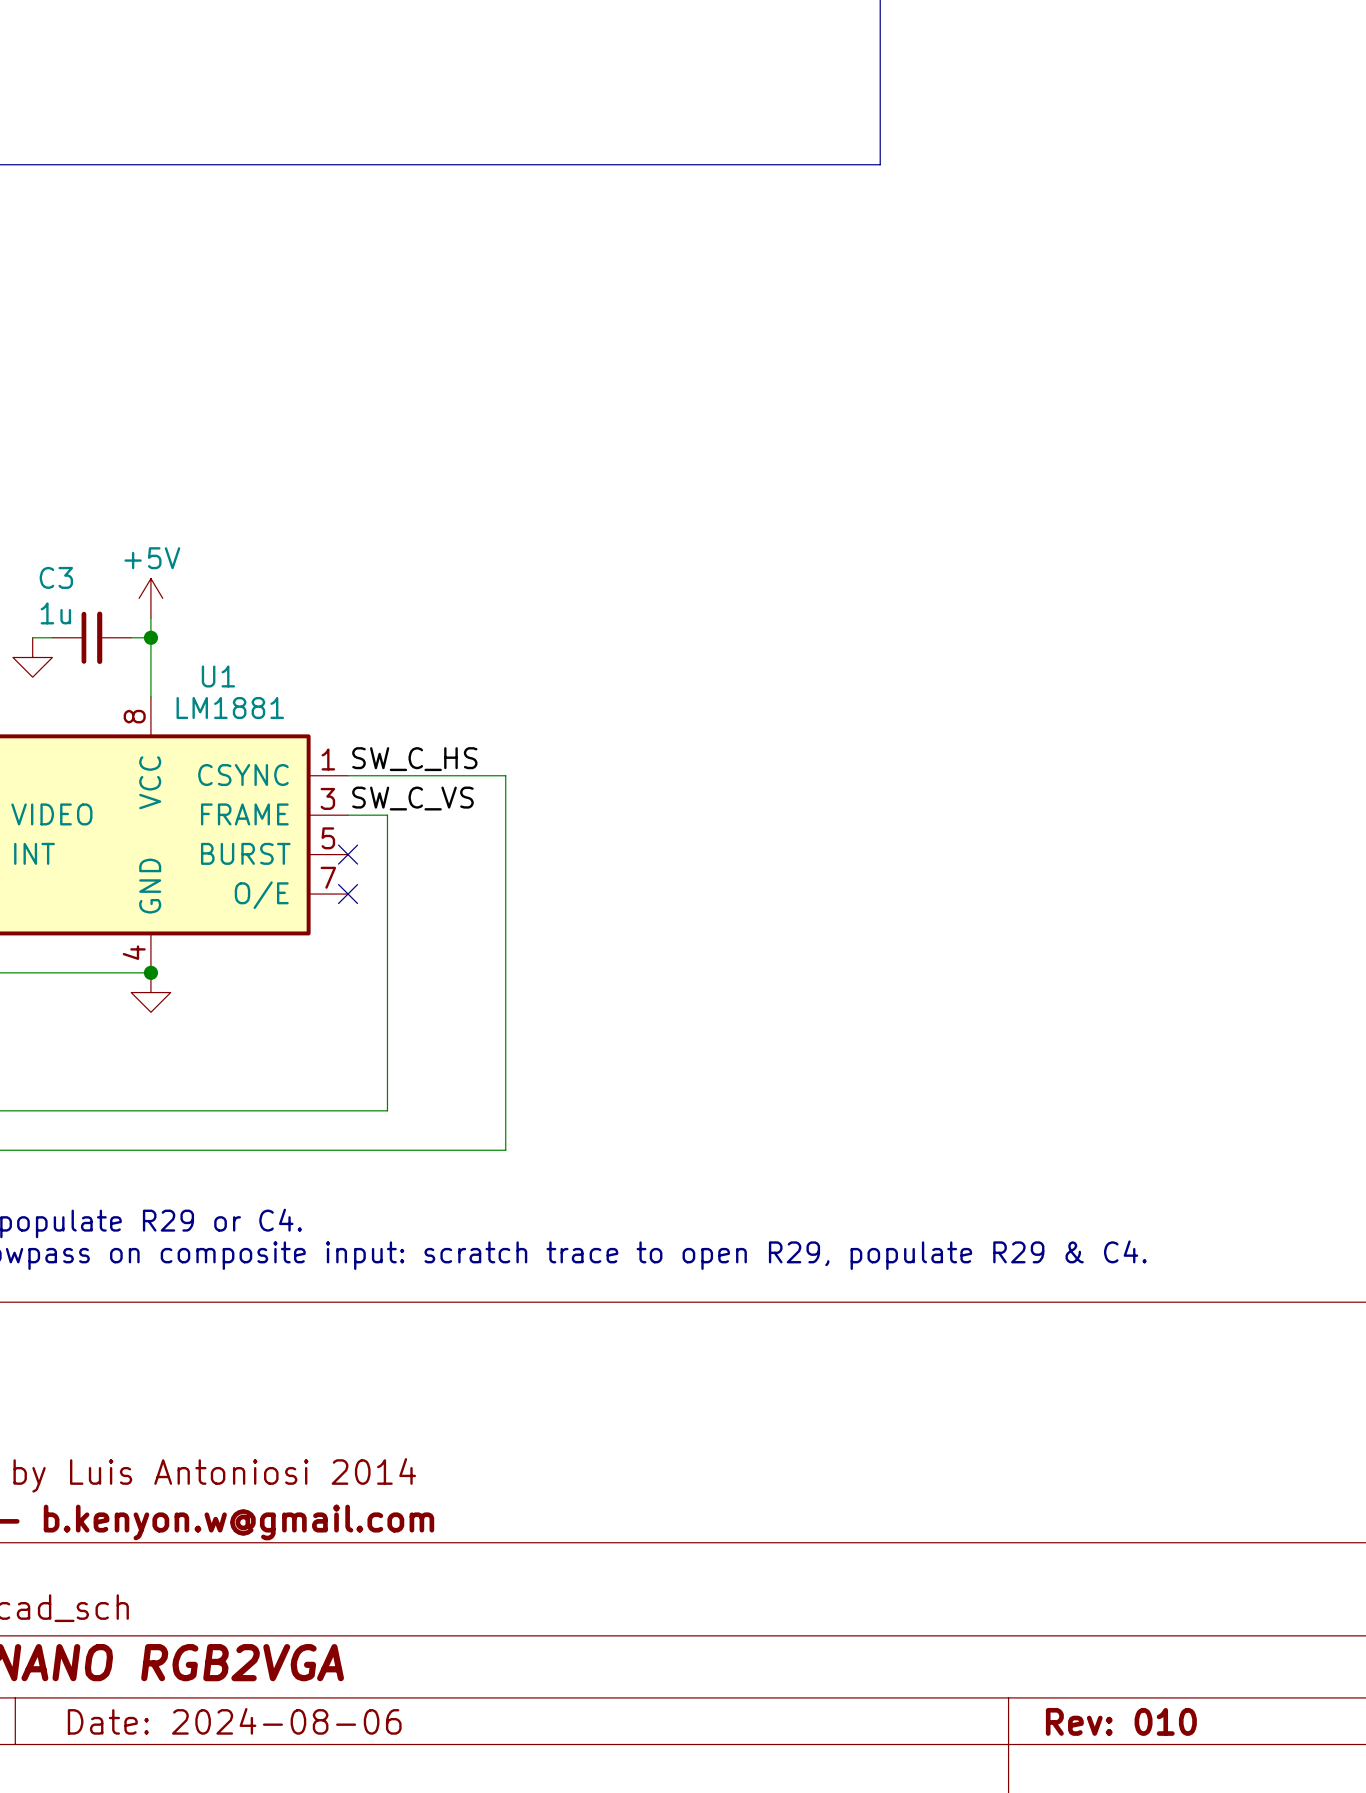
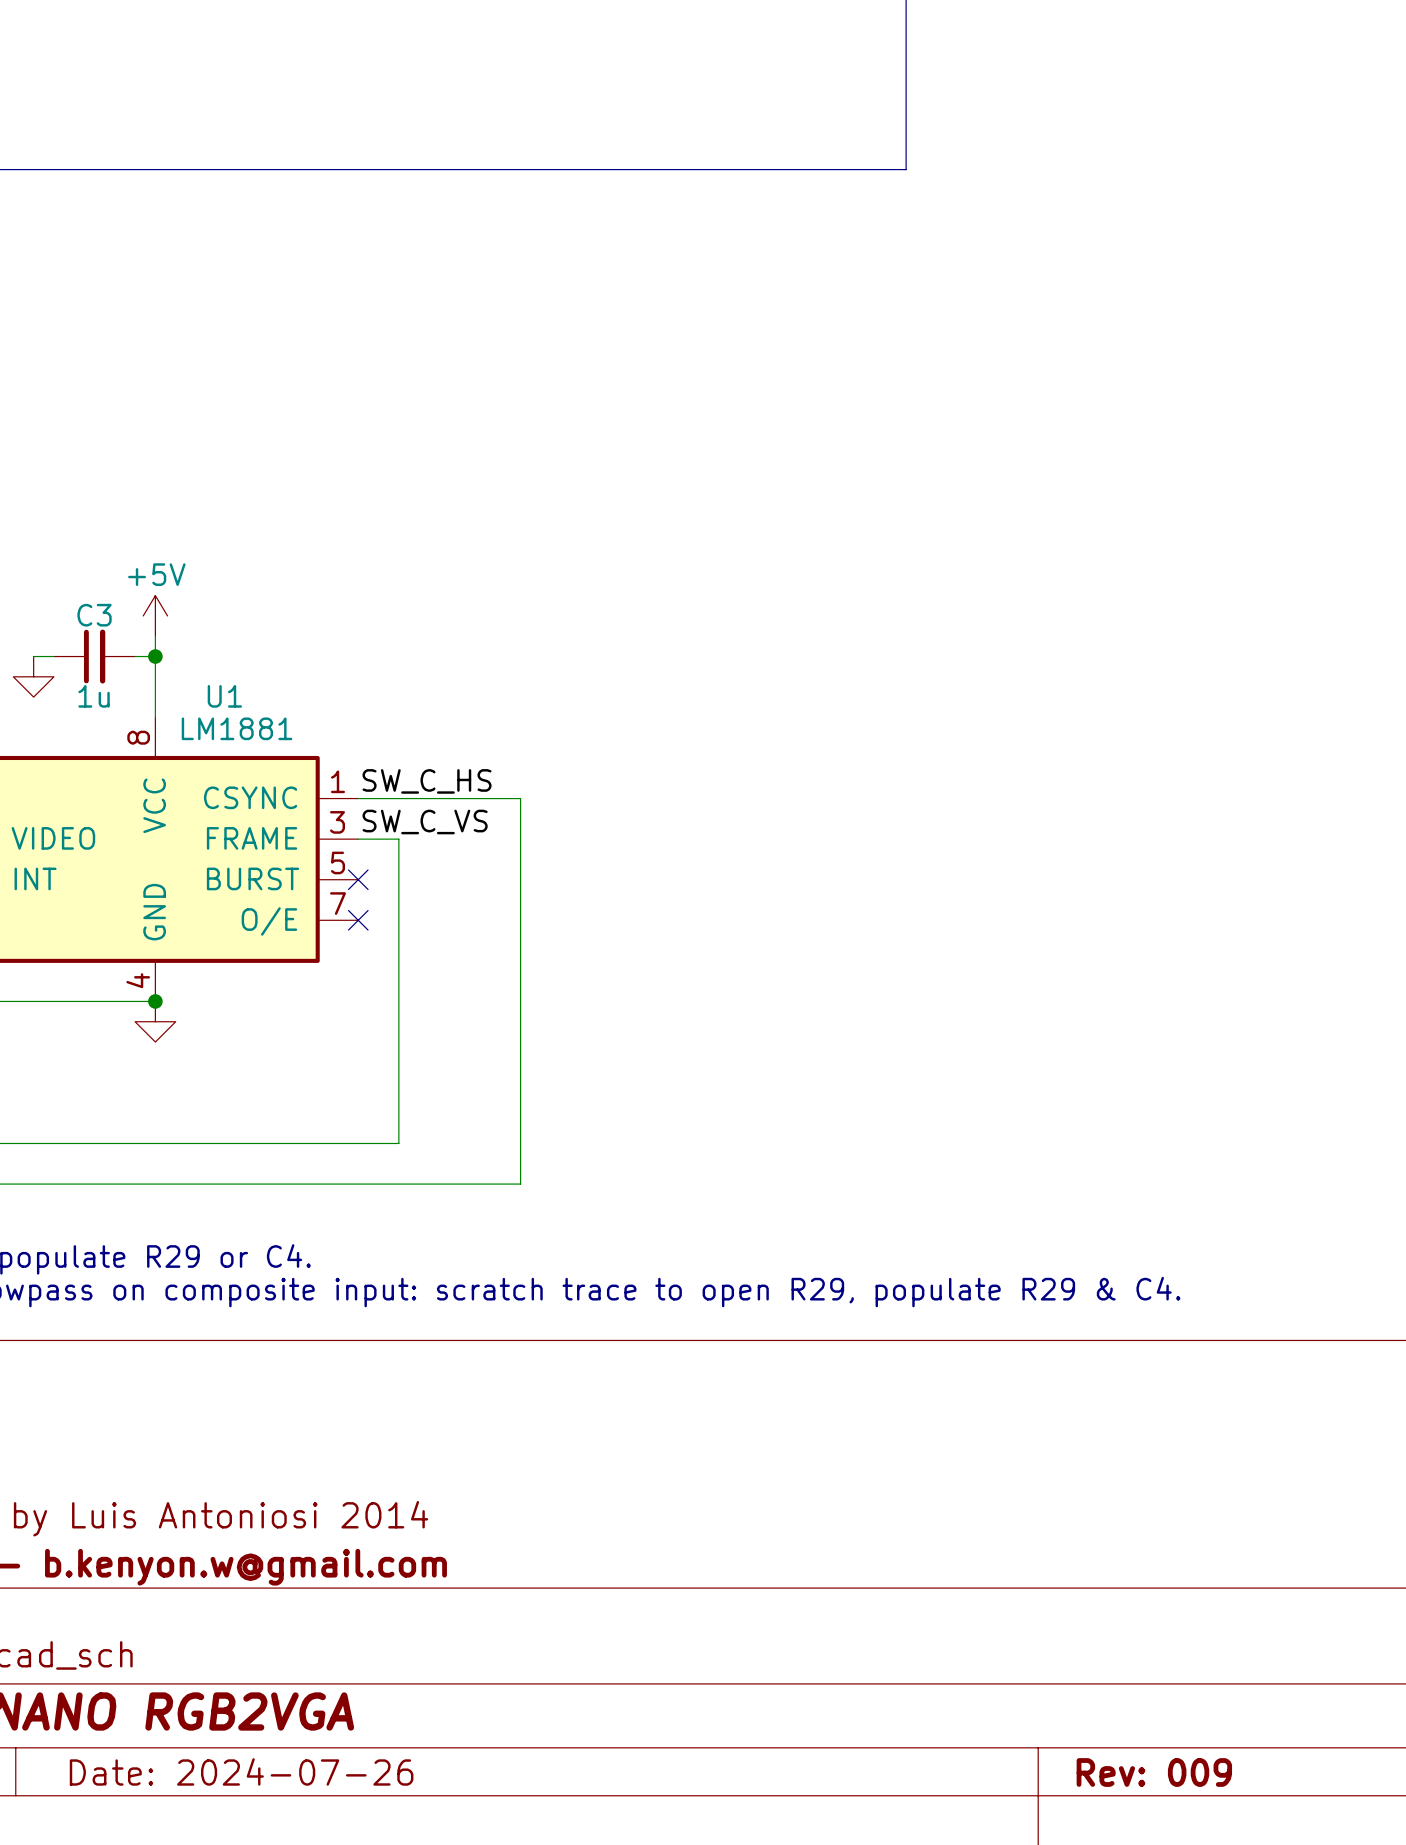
C3 name position: C3 (56, 577) -> C3 (94, 615)
C3 value position: 1u (55, 613) -> 1u (94, 696)
title block: Date: 2024-08-06 (234, 1721) -> Date: 2024-07-26 (241, 1771)
title block: Rev: 010 (1121, 1721) -> Rev: 009 (1154, 1772)

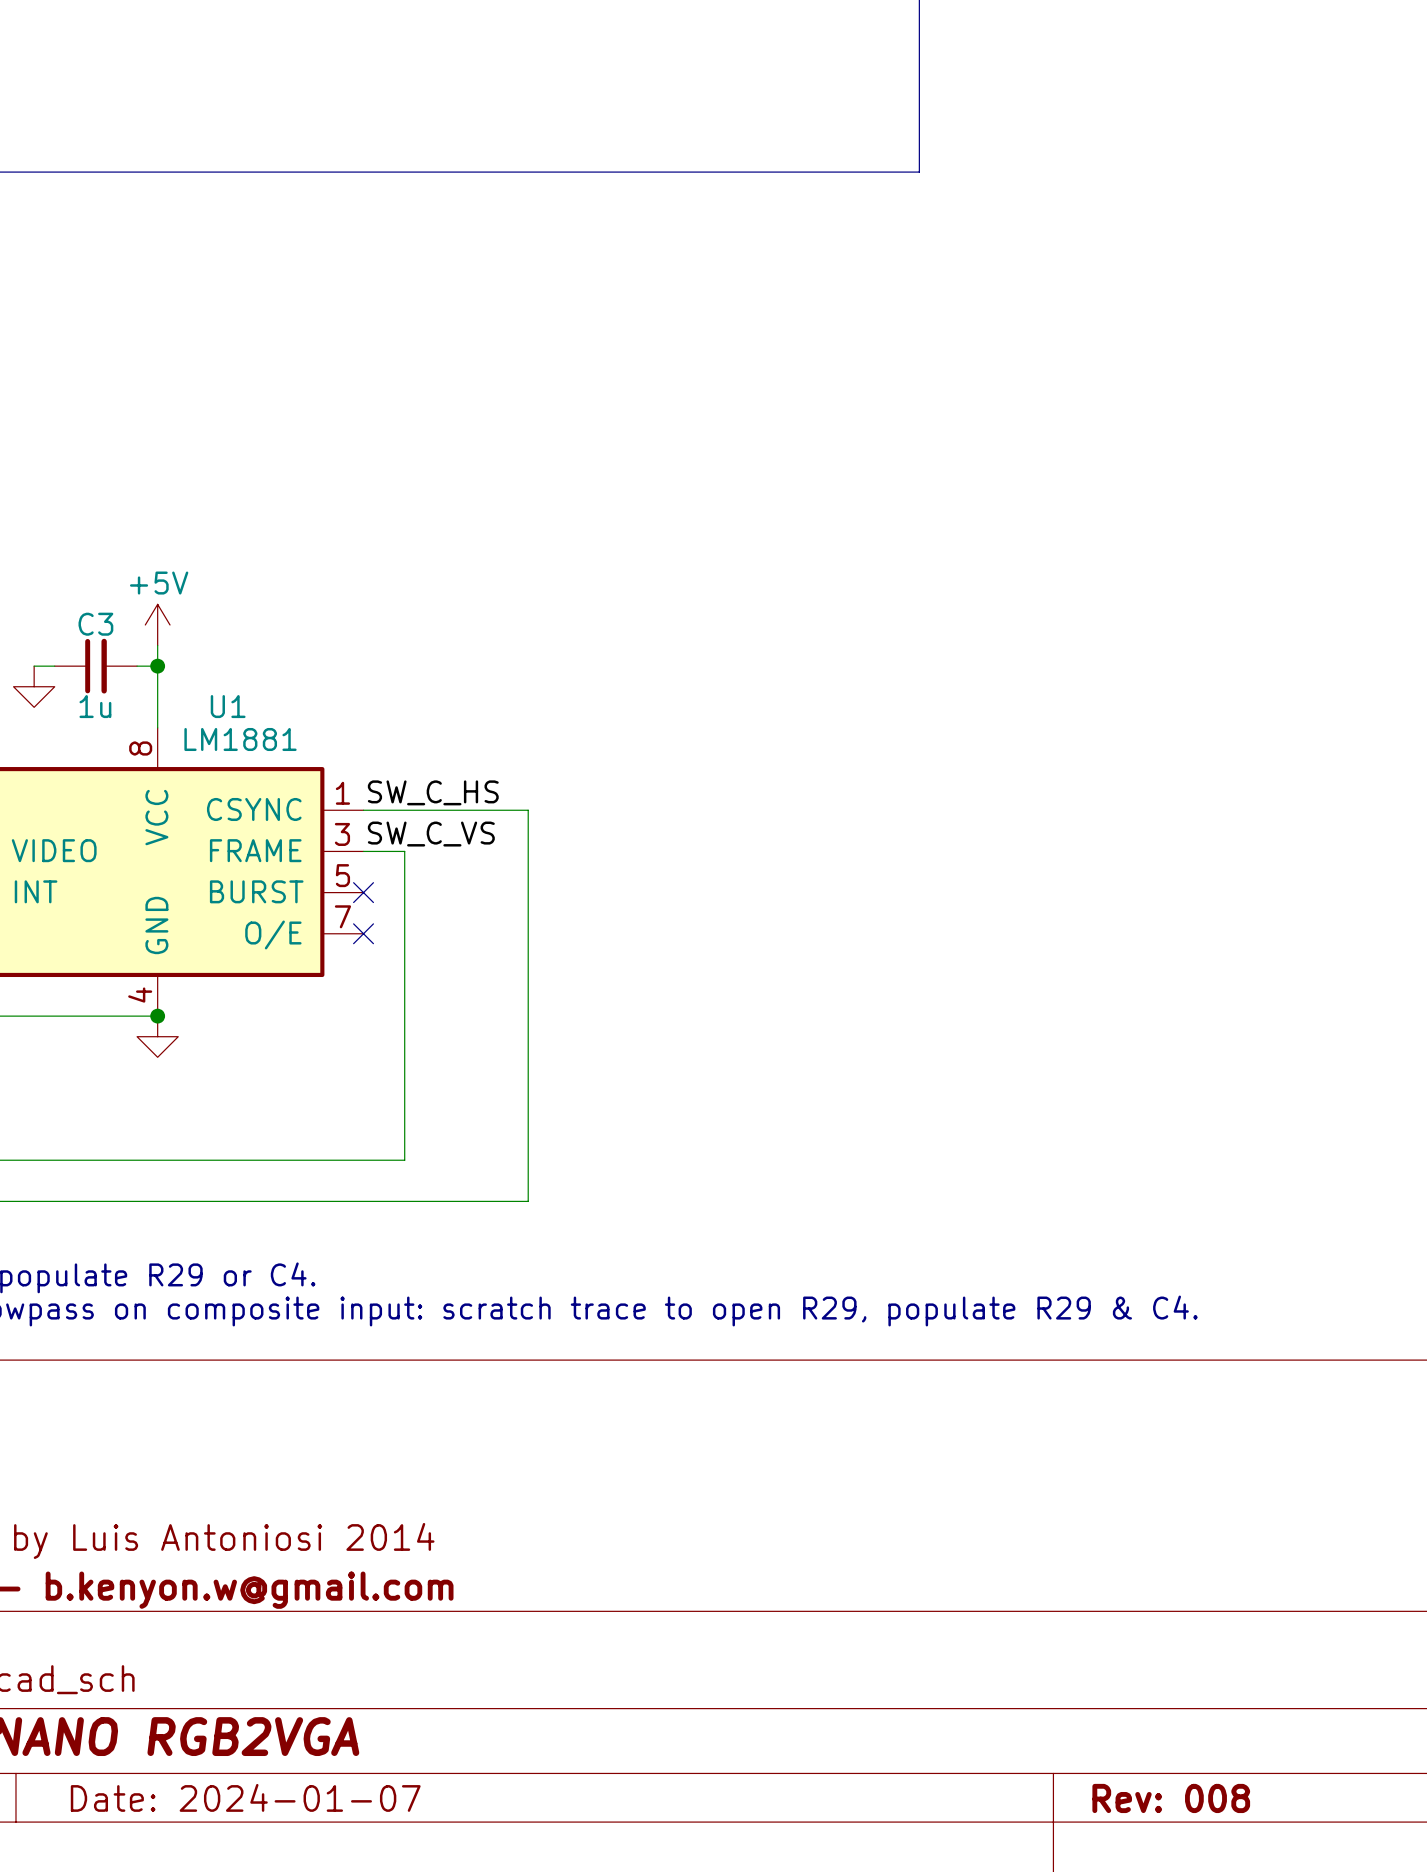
title block: Date: 2024-07-26 (241, 1771) -> Date: 2024-01-07 (245, 1797)
title block: Rev: 009 (1154, 1772) -> Rev: 008 (1171, 1798)

